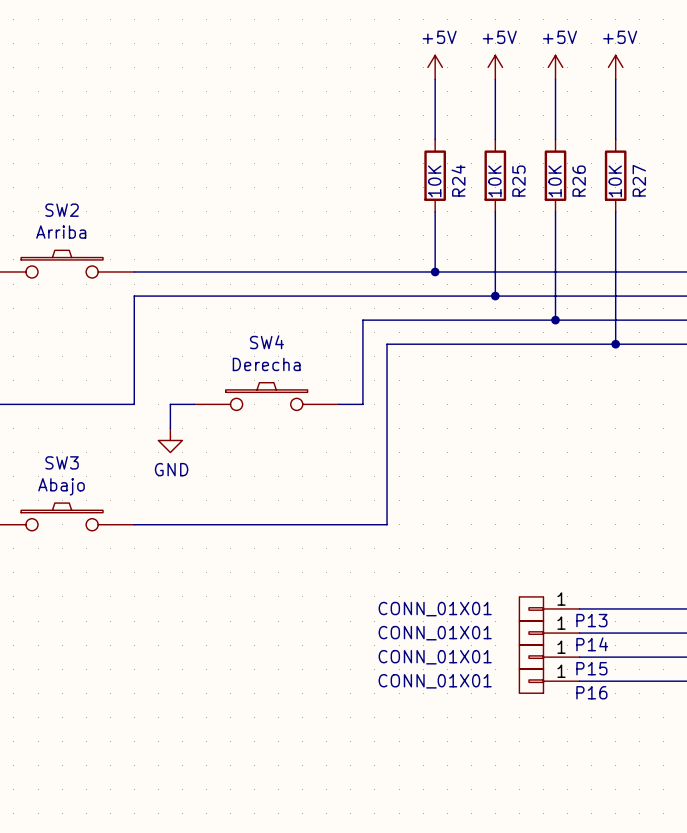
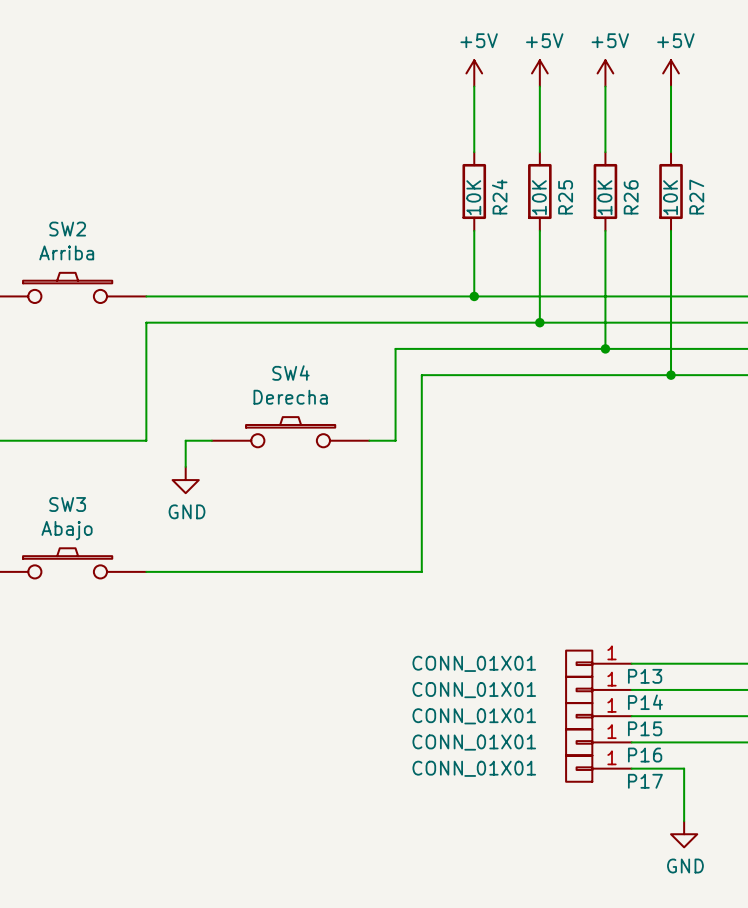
P17: none -> CONN_01X01 (598, 768)
wire: none -> (631, 768) (684, 768) (684, 821)
power symbol: none -> GND (684, 834)

